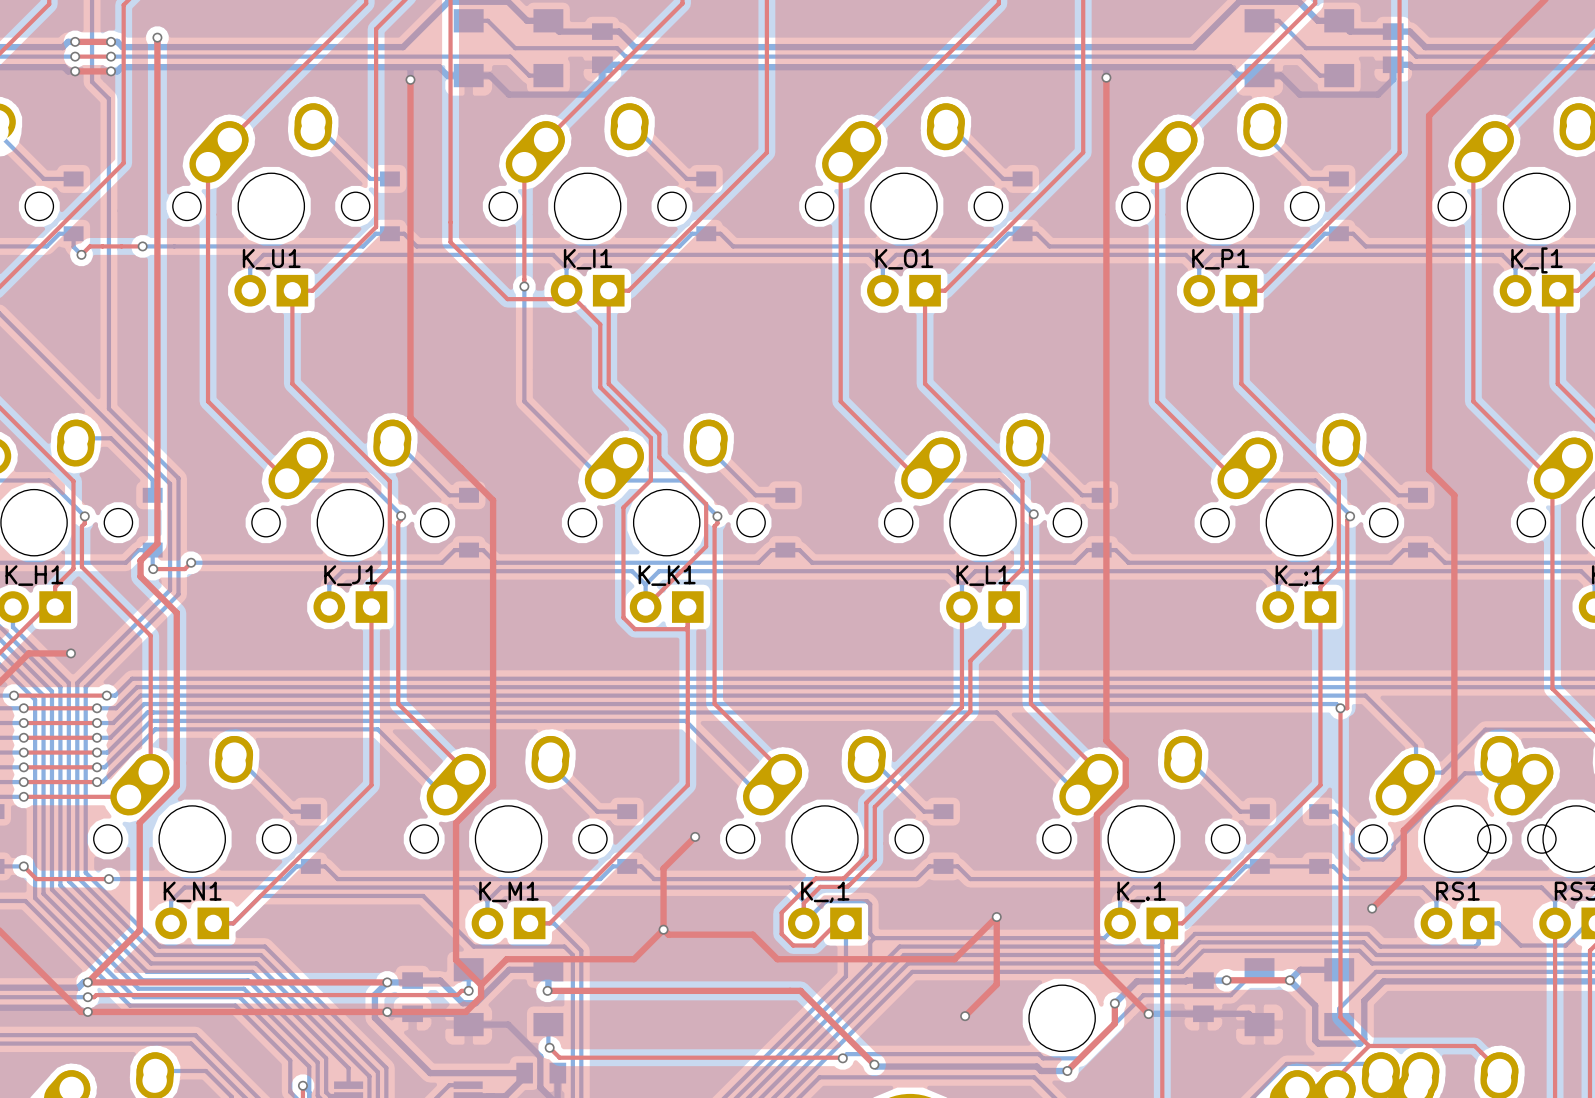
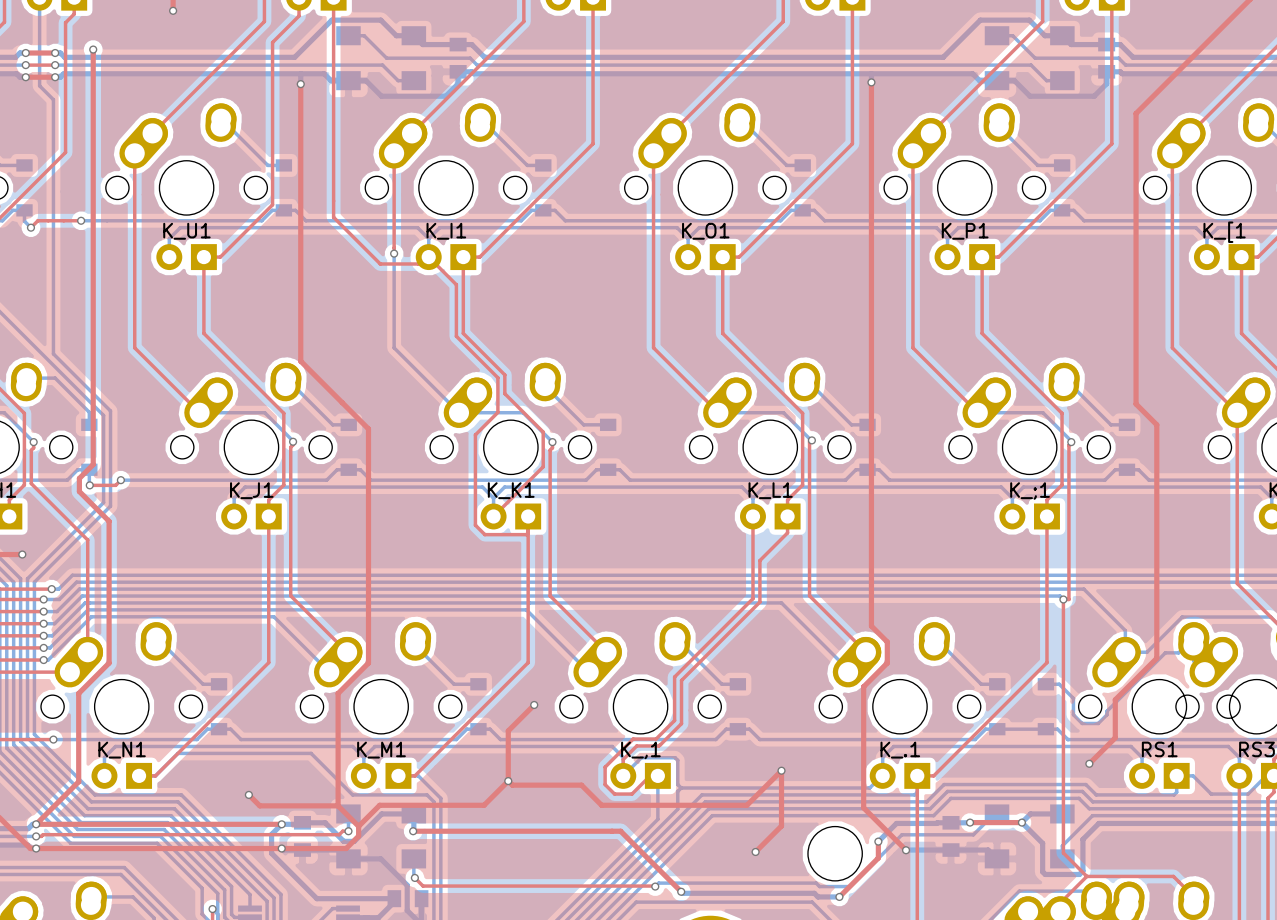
top track: none -> (248, 794) (259, 805) (338, 805)
via: none -> (248, 794)

